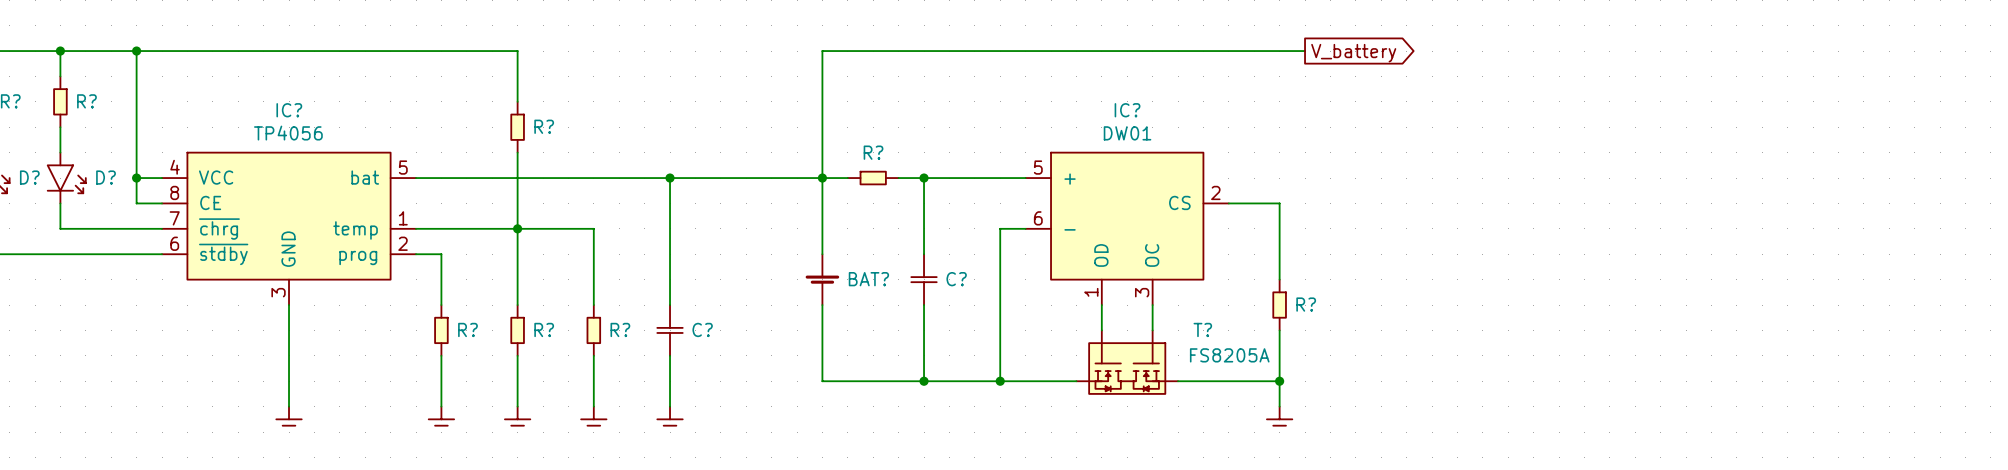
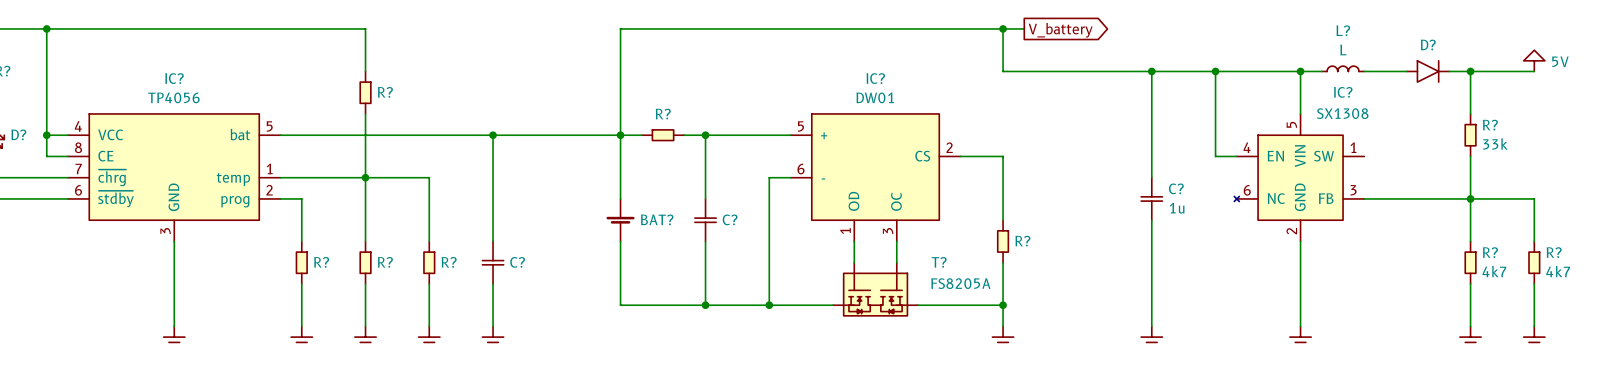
wire: none -> (1003, 28) (1003, 71) (1321, 71)
junction: none -> (1003, 28)
power symbol: none -> 5V (1534, 60)
L?: none -> L (1343, 68)
wire: none -> (1151, 71) (1151, 177)
junction: none -> (1151, 71)
wire: none -> (1215, 71) (1215, 156) (1236, 156)
junction: none -> (1215, 71)
wire: none -> (1300, 71) (1300, 113)
junction: none -> (1300, 71)
wire: none -> (1364, 71) (1406, 71)
D?: none -> (1428, 71)
wire: none -> (1449, 71) (1534, 71)
wire: none -> (1470, 71) (1470, 113)
junction: none -> (1470, 71)
R?: none -> 33k (1470, 135)
wire: none -> (1470, 156) (1470, 241)
IC?: none -> SX1308 (1299, 177)
C?: none -> 1u (1151, 198)
wire: none -> (1364, 198) (1534, 198) (1534, 241)
junction: none -> (1470, 198)
wire: none -> (1151, 220) (1151, 326)
wire: none -> (1300, 241) (1300, 326)
R?: none -> 4k7 (1470, 262)
R?: none -> 4k7 (1534, 262)
wire: none -> (1470, 283) (1470, 326)
wire: none -> (1534, 283) (1534, 326)
power symbol: none -> (1151, 337)
power symbol: none -> (1300, 337)
power symbol: none -> (1470, 337)
power symbol: none -> (1534, 337)

